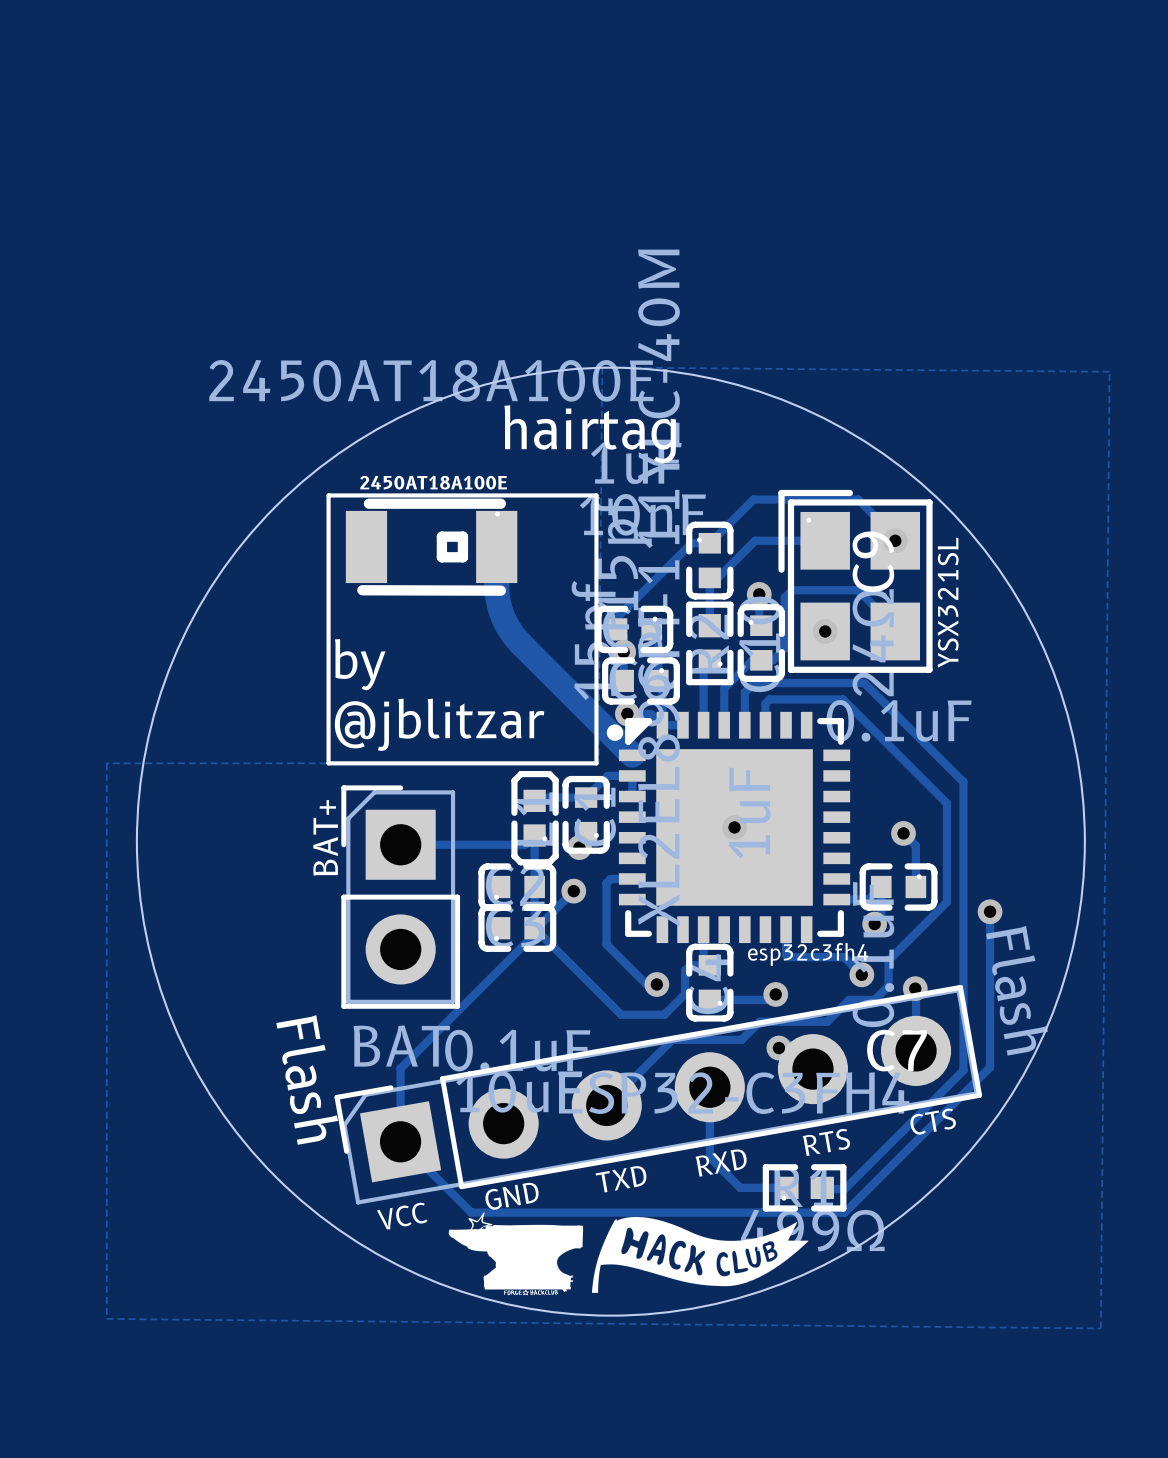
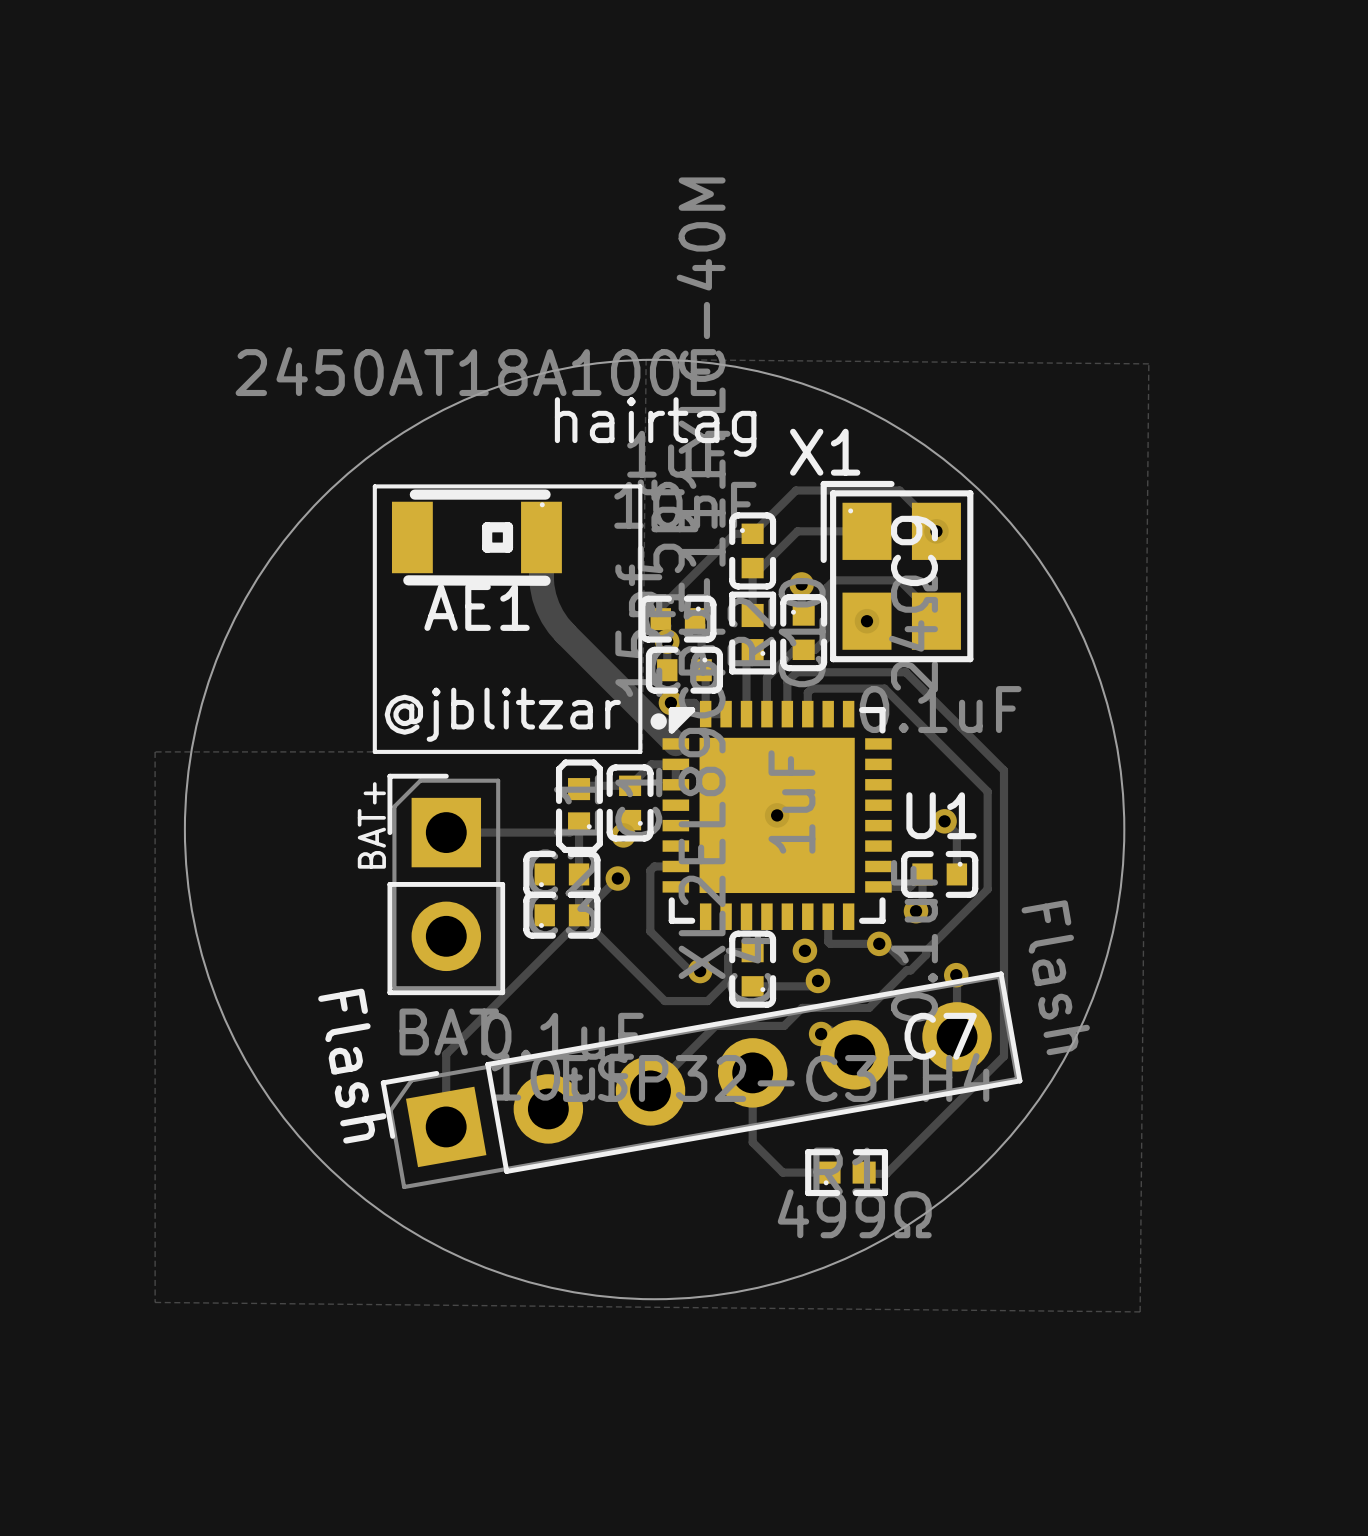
2450AT18A100E name: 2450AT18A100E (433, 482) -> AE1 (477, 607)
YSX321SL name: YSX321SL (948, 602) -> X1 (825, 452)
text: by (360, 664) -> none
track: (990, 911) (990, 1067) (844, 1212) (471, 1212) (400, 1141) -> none
via: (990, 911) -> none
esp32c3fh4 name: esp32c3fh4 (808, 954) -> U1 (941, 815)
track: (888, 960) (888, 985) (874, 999) (849, 999) -> (929, 947) (926, 950) (926, 954) (890, 986)
via: none -> (804, 950)
via position: (861, 974) -> (879, 943)
text: CTS (933, 1121) -> none
text: RTS (826, 1142) -> none
text: RXD (721, 1163) -> none
text: TXD (621, 1179) -> none
text: GND (511, 1196) -> none
drawing: [448, 1212, 809, 1296] -> none
text: VCC (402, 1216) -> none

